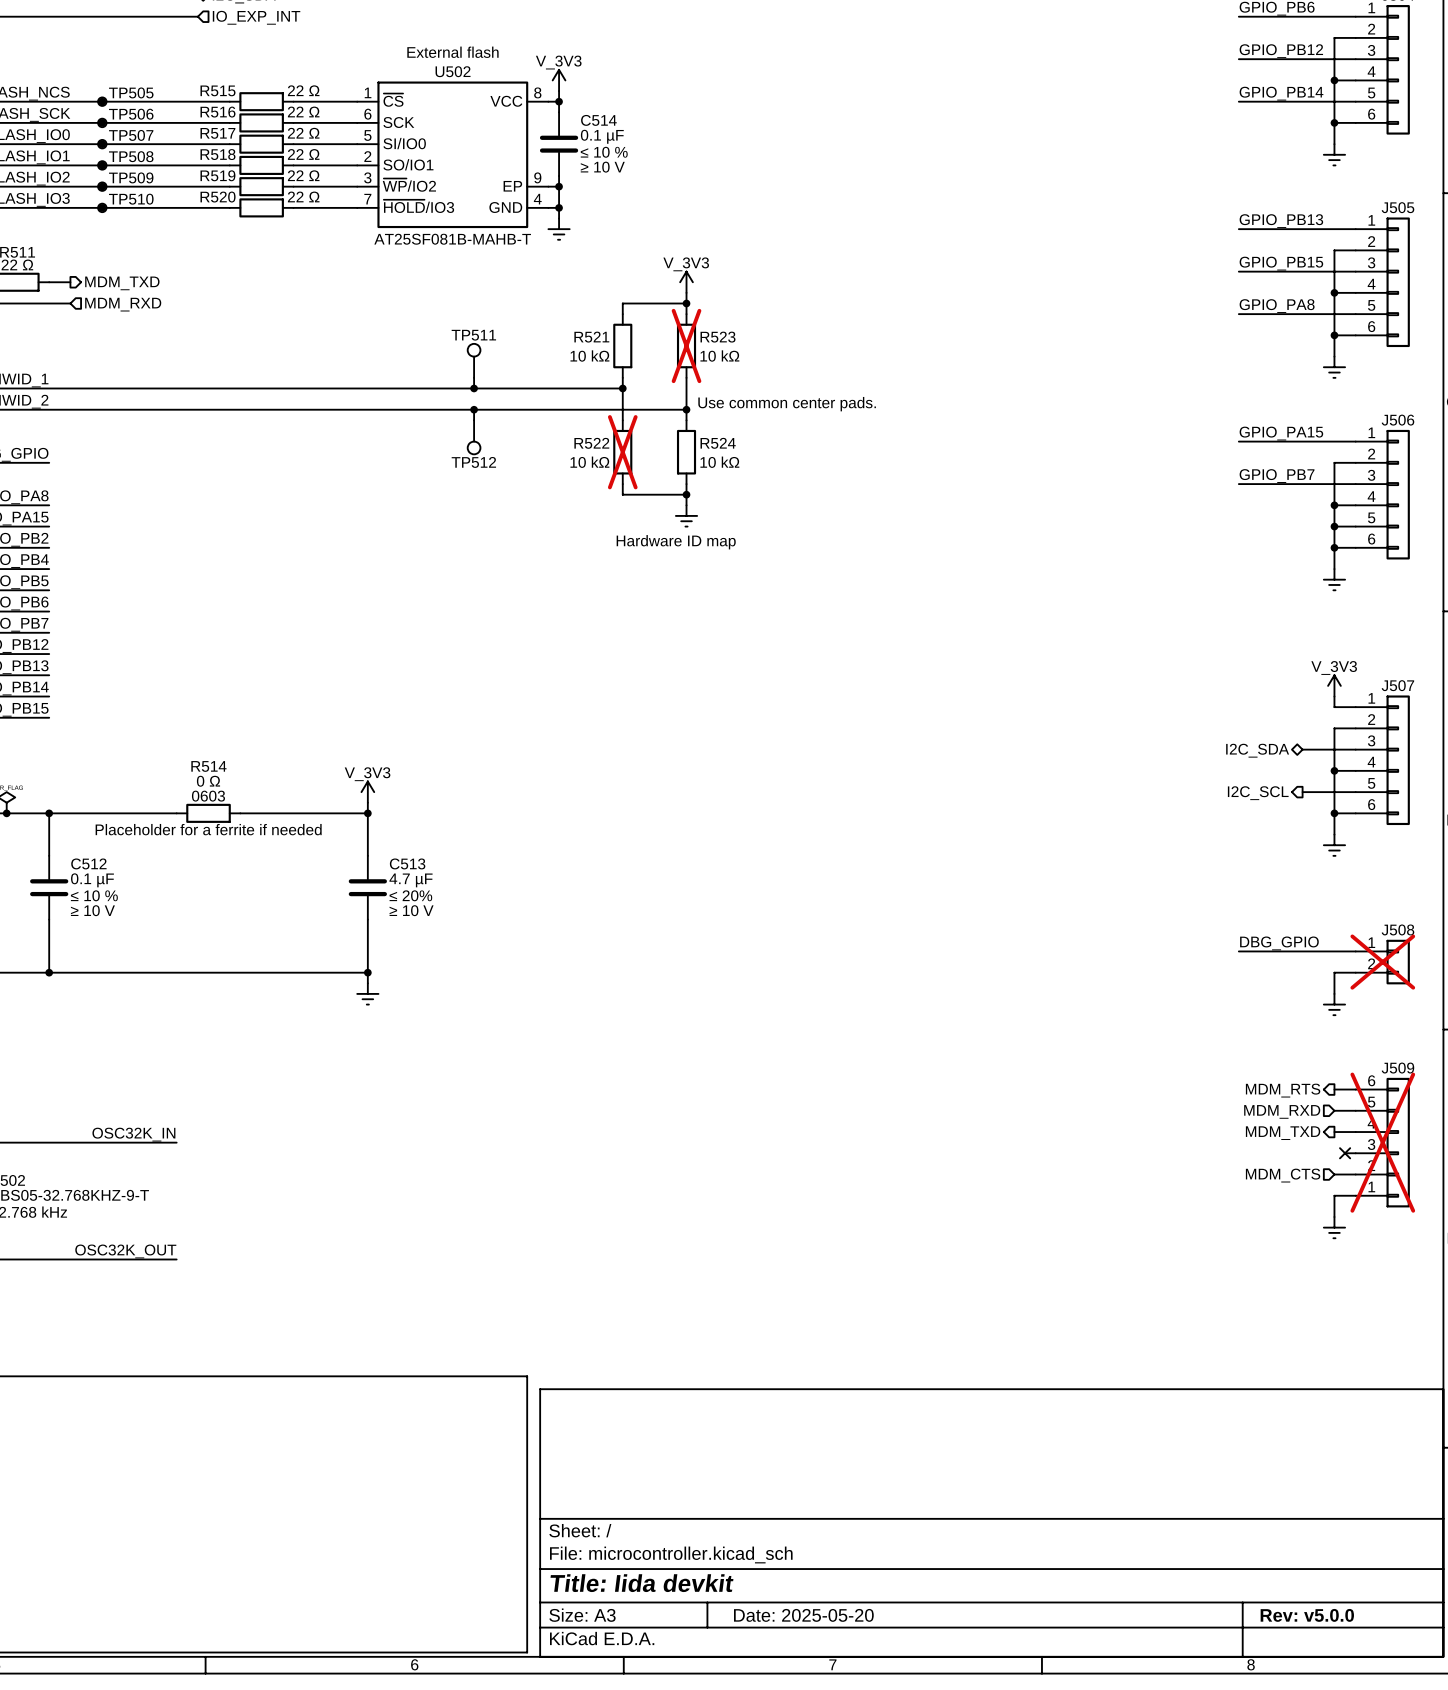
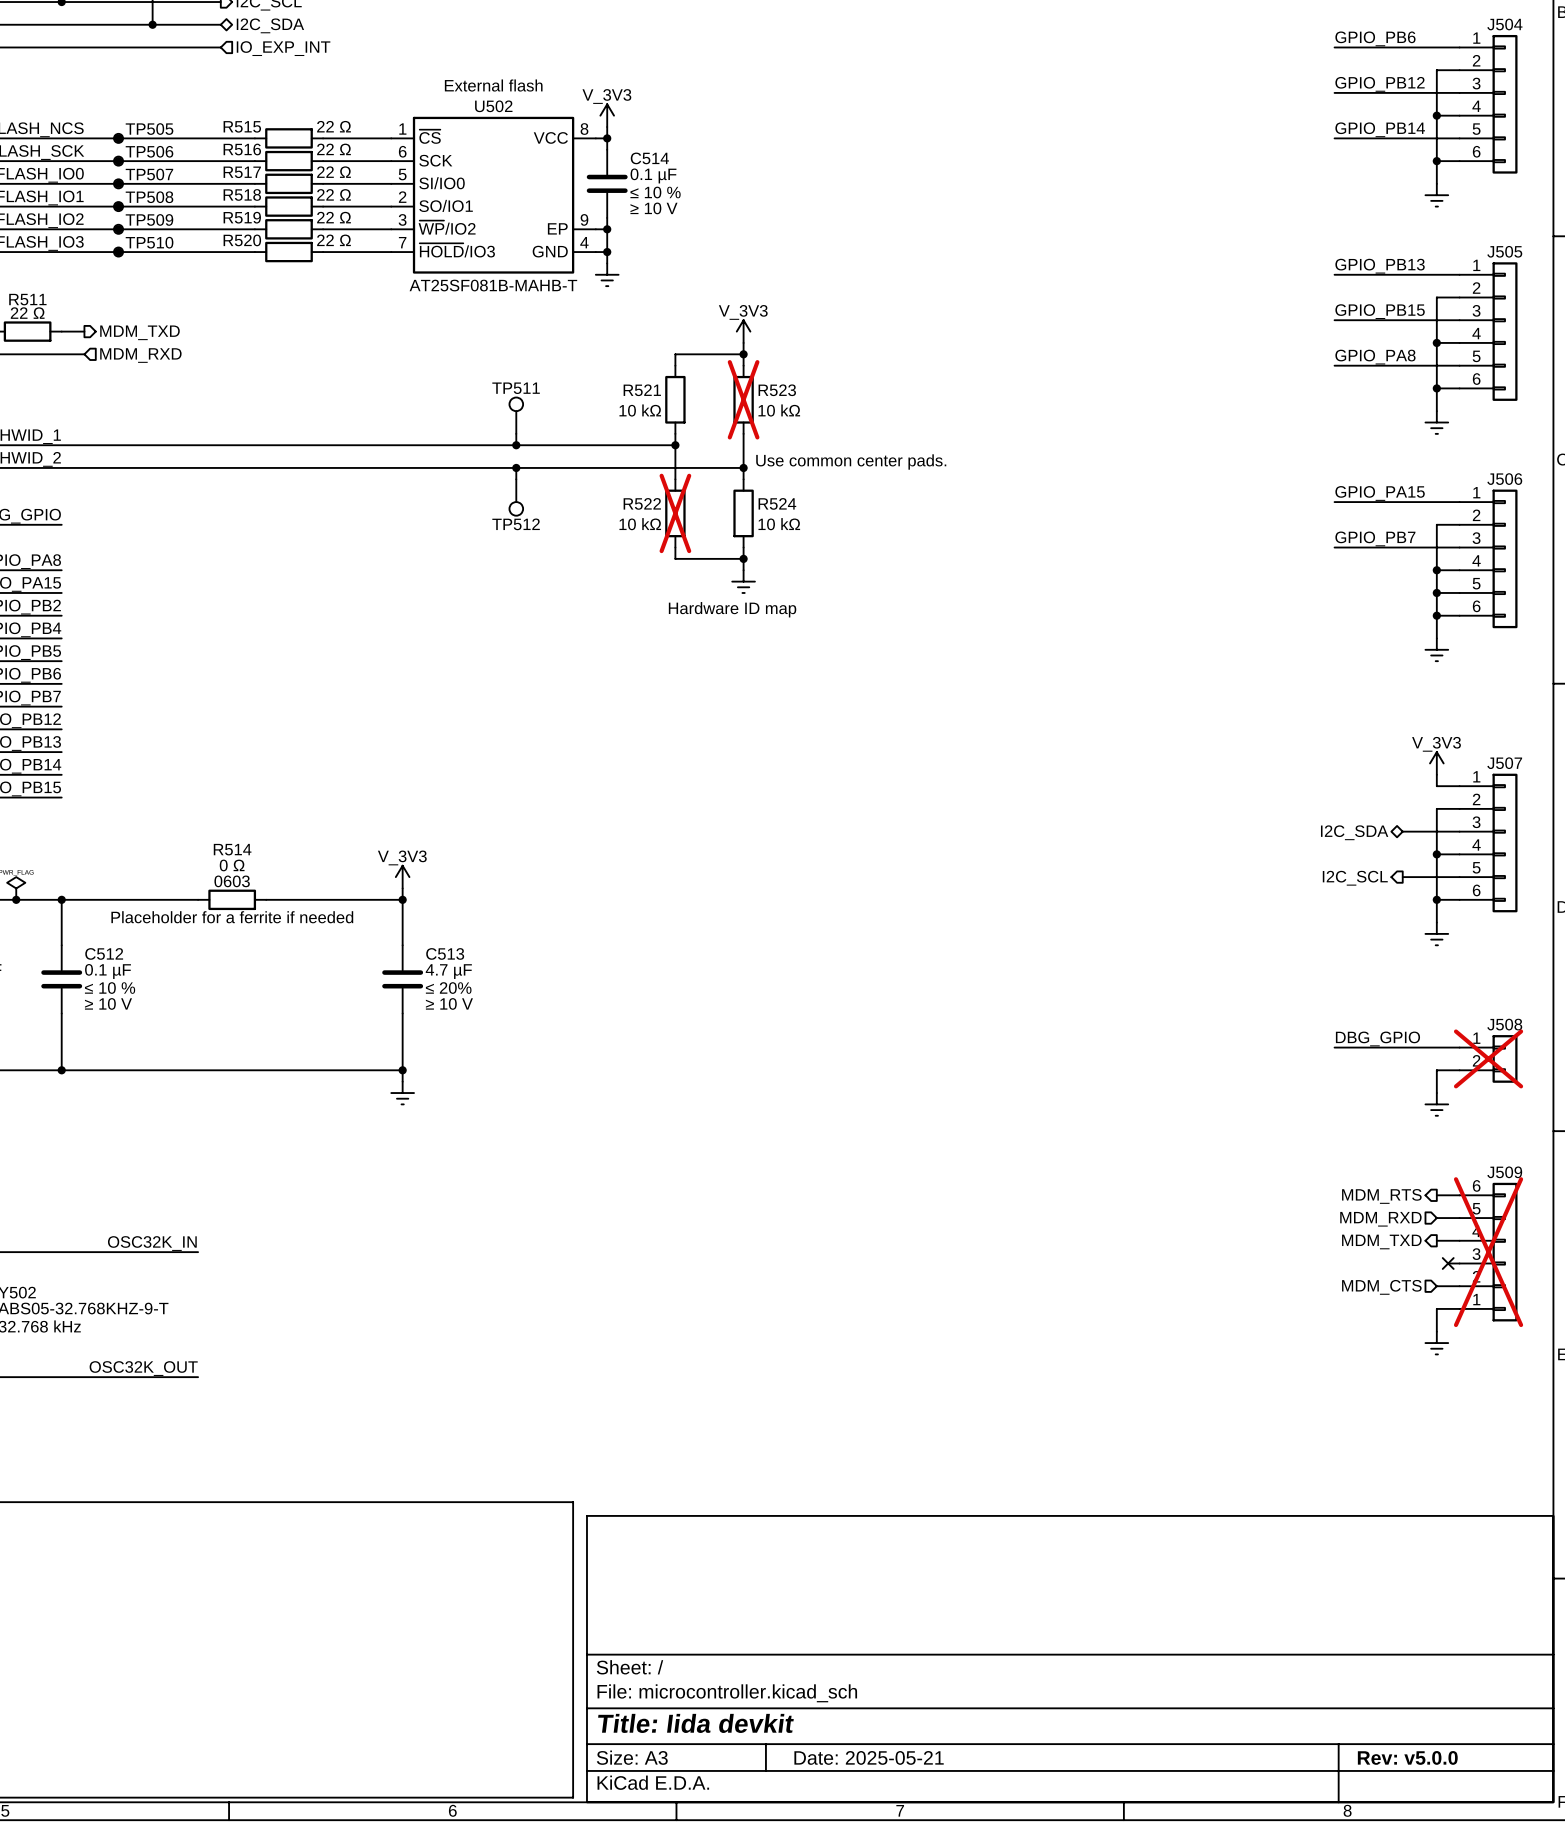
title block: Date: 2025-05-20 (803, 1615) -> Date: 2025-05-21 (869, 1757)

